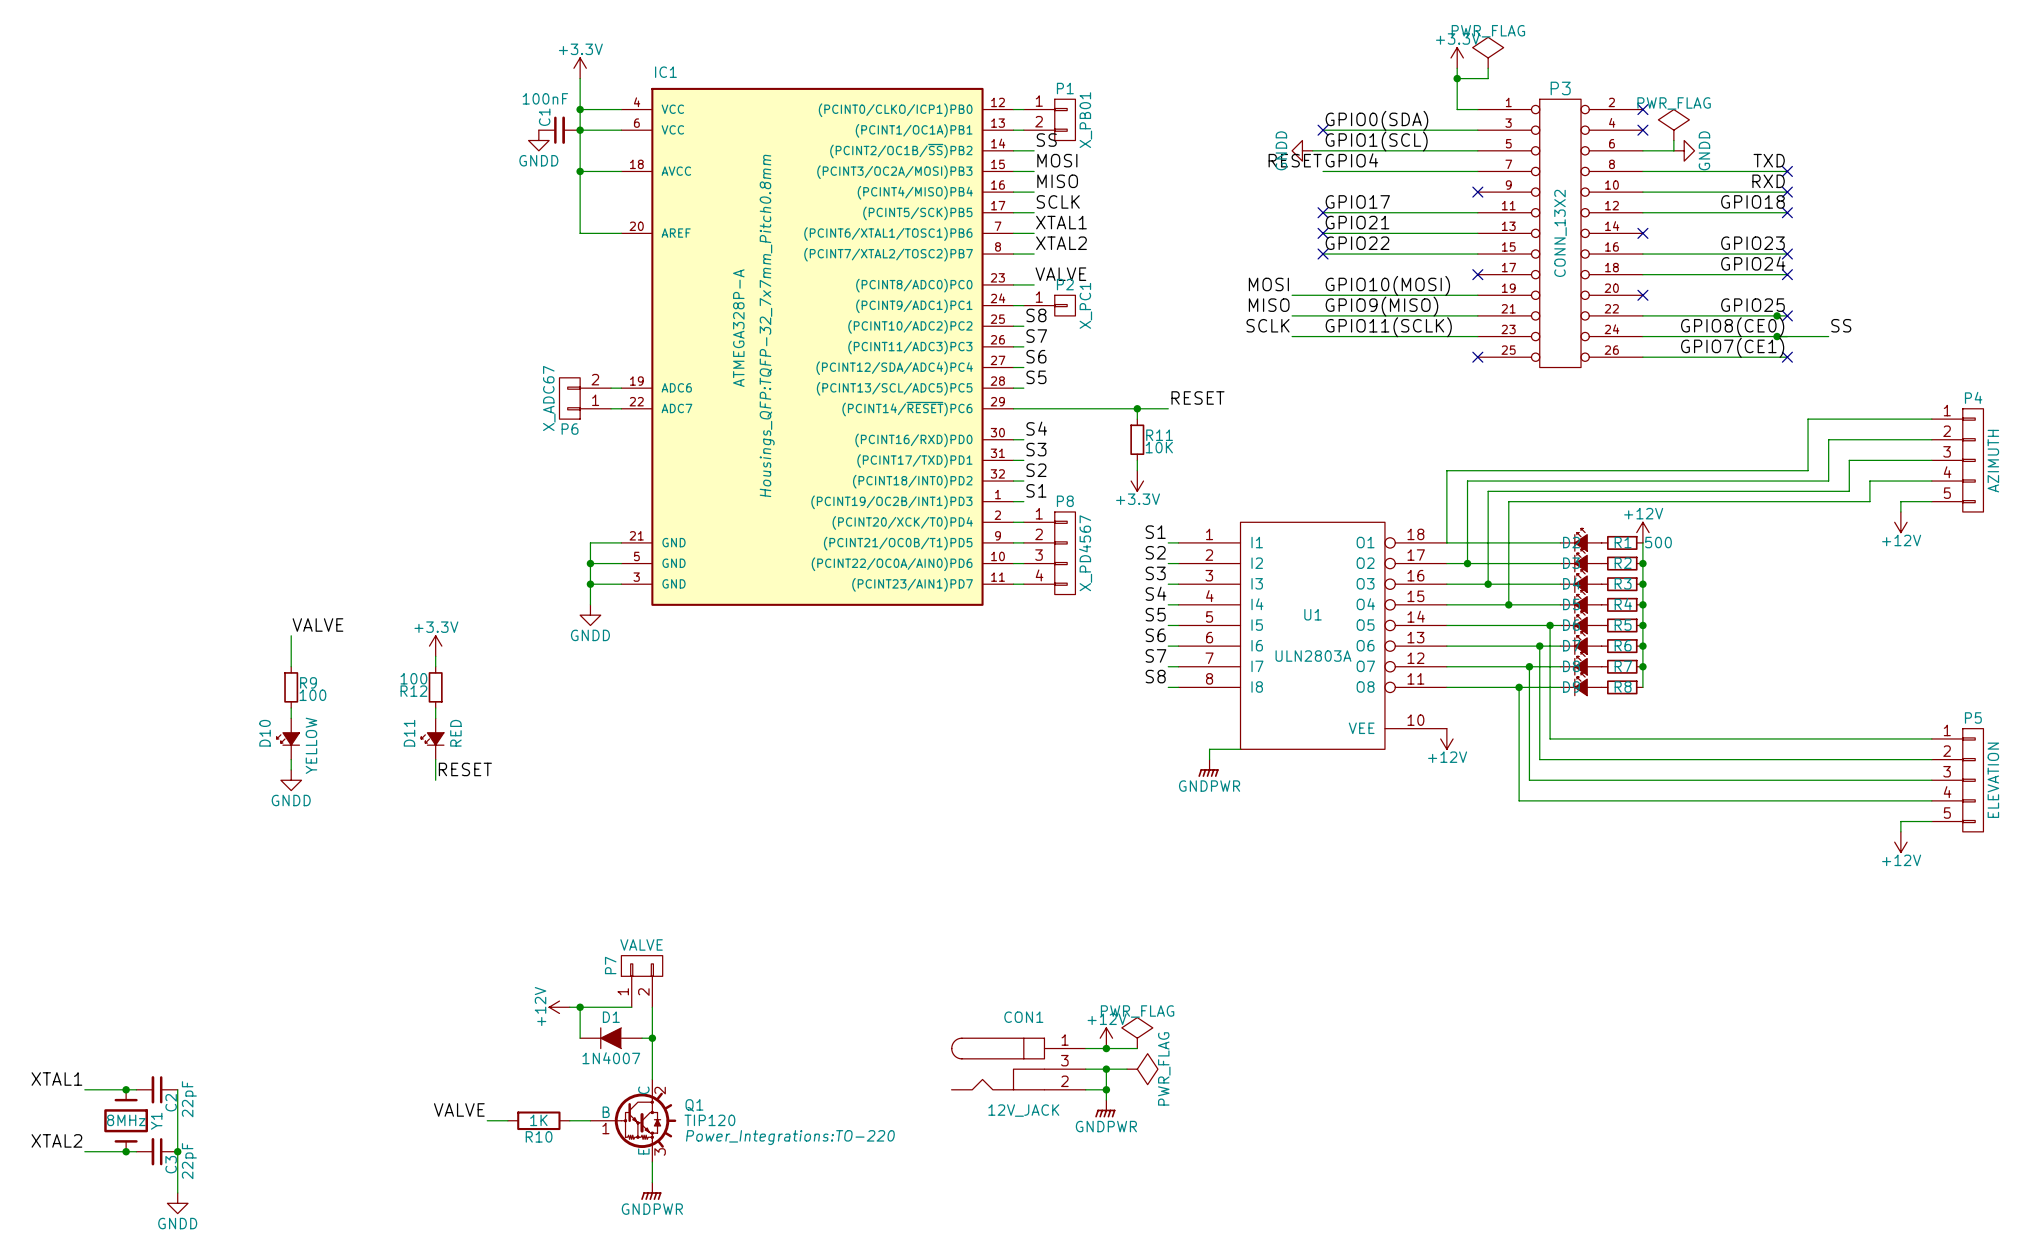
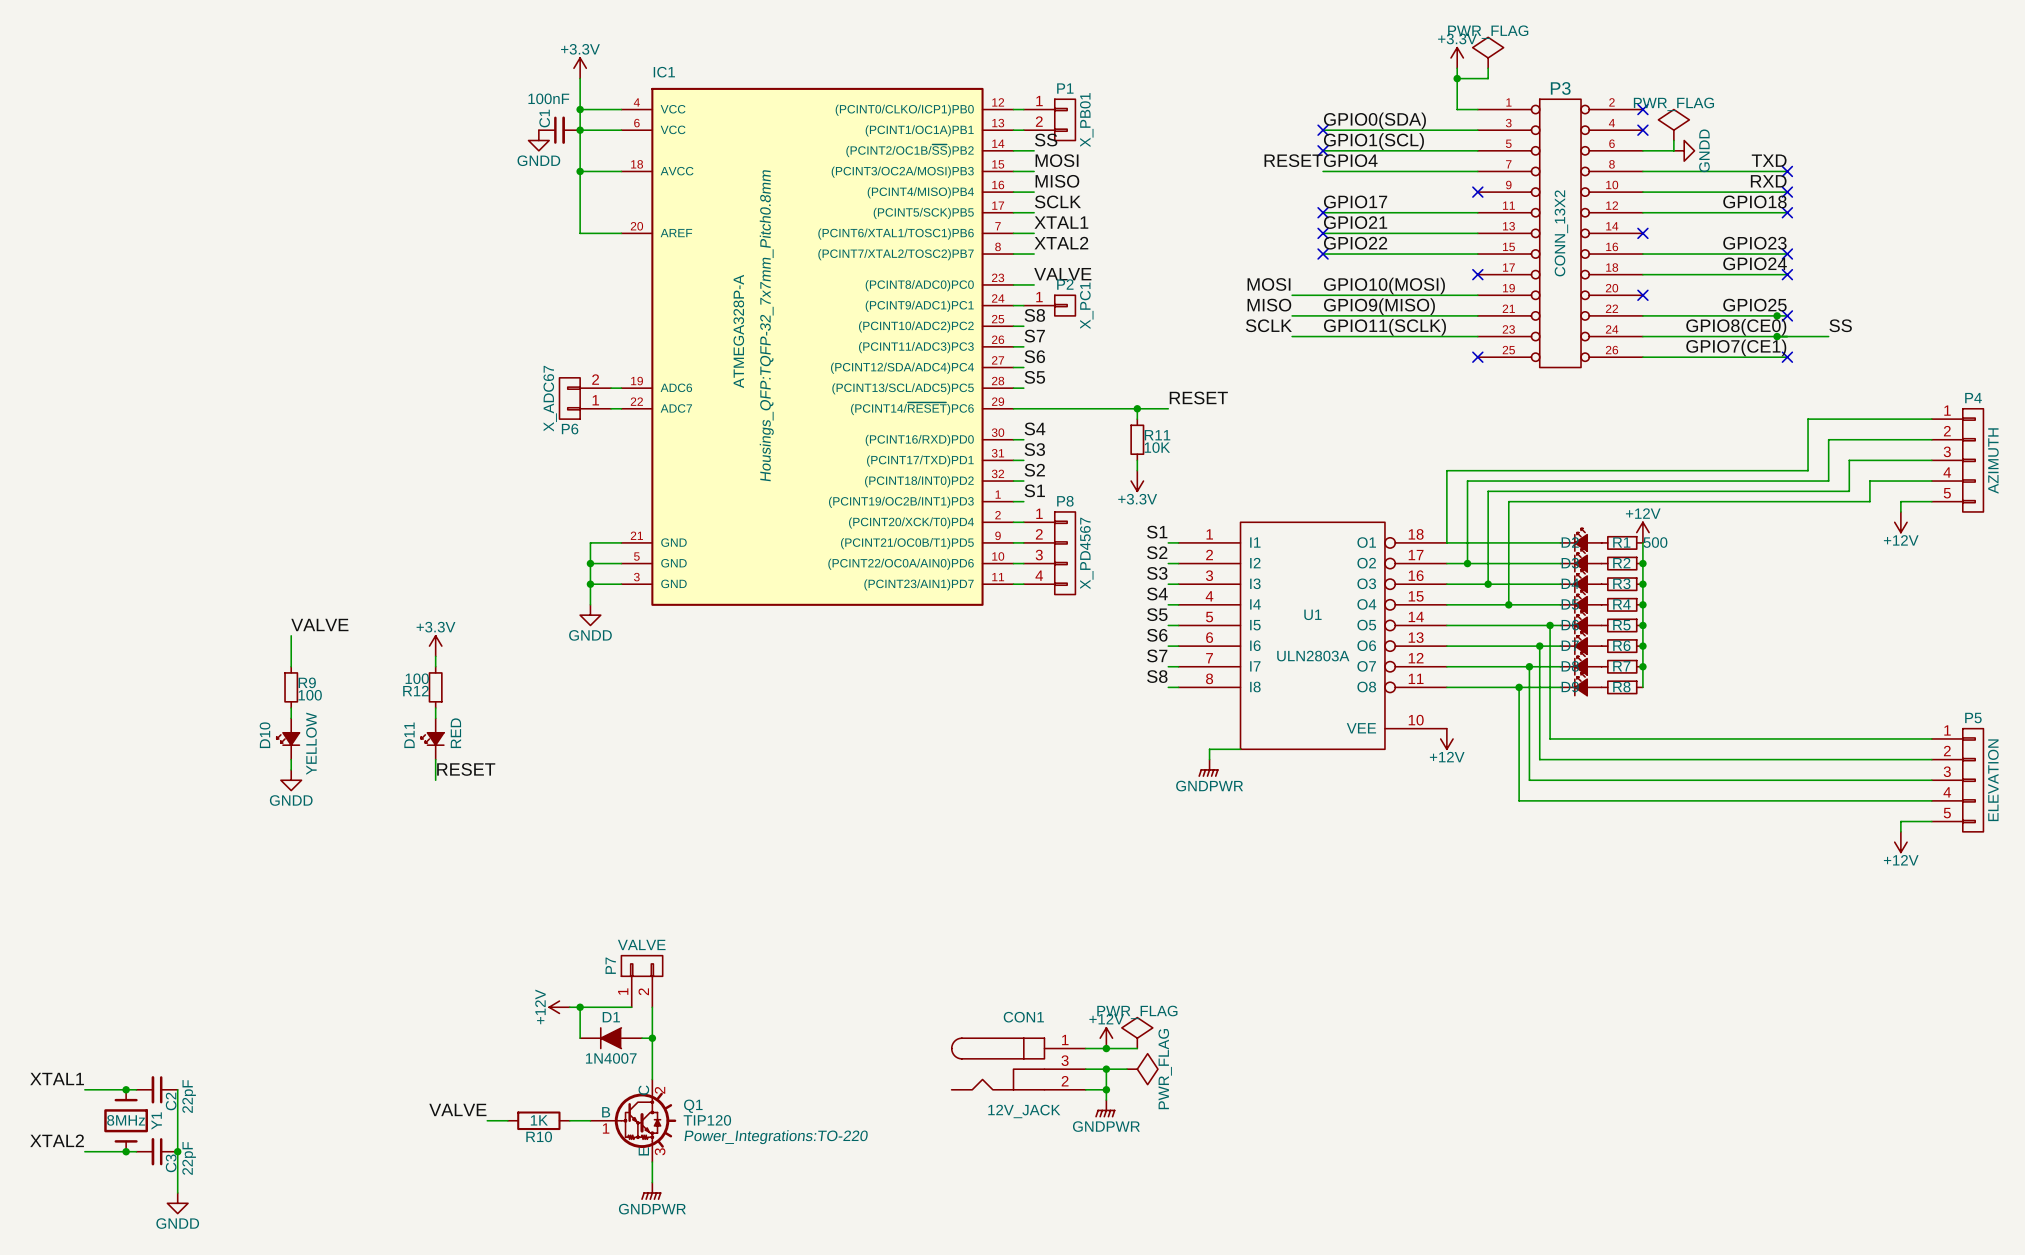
power symbol: GNDD (1302, 150) -> none
wire: (1312, 150) (1323, 150) -> none
no-connect mark: none -> (1323, 150)

